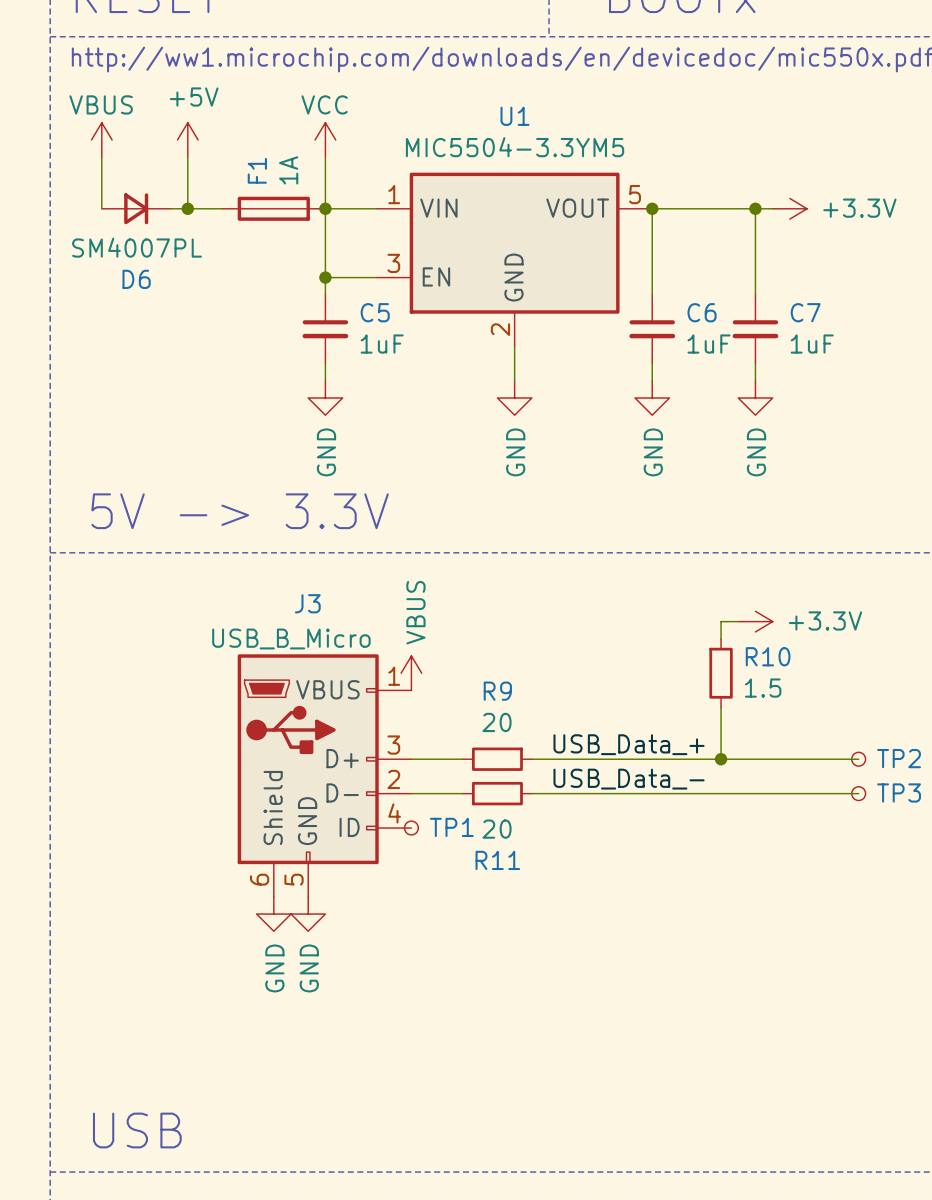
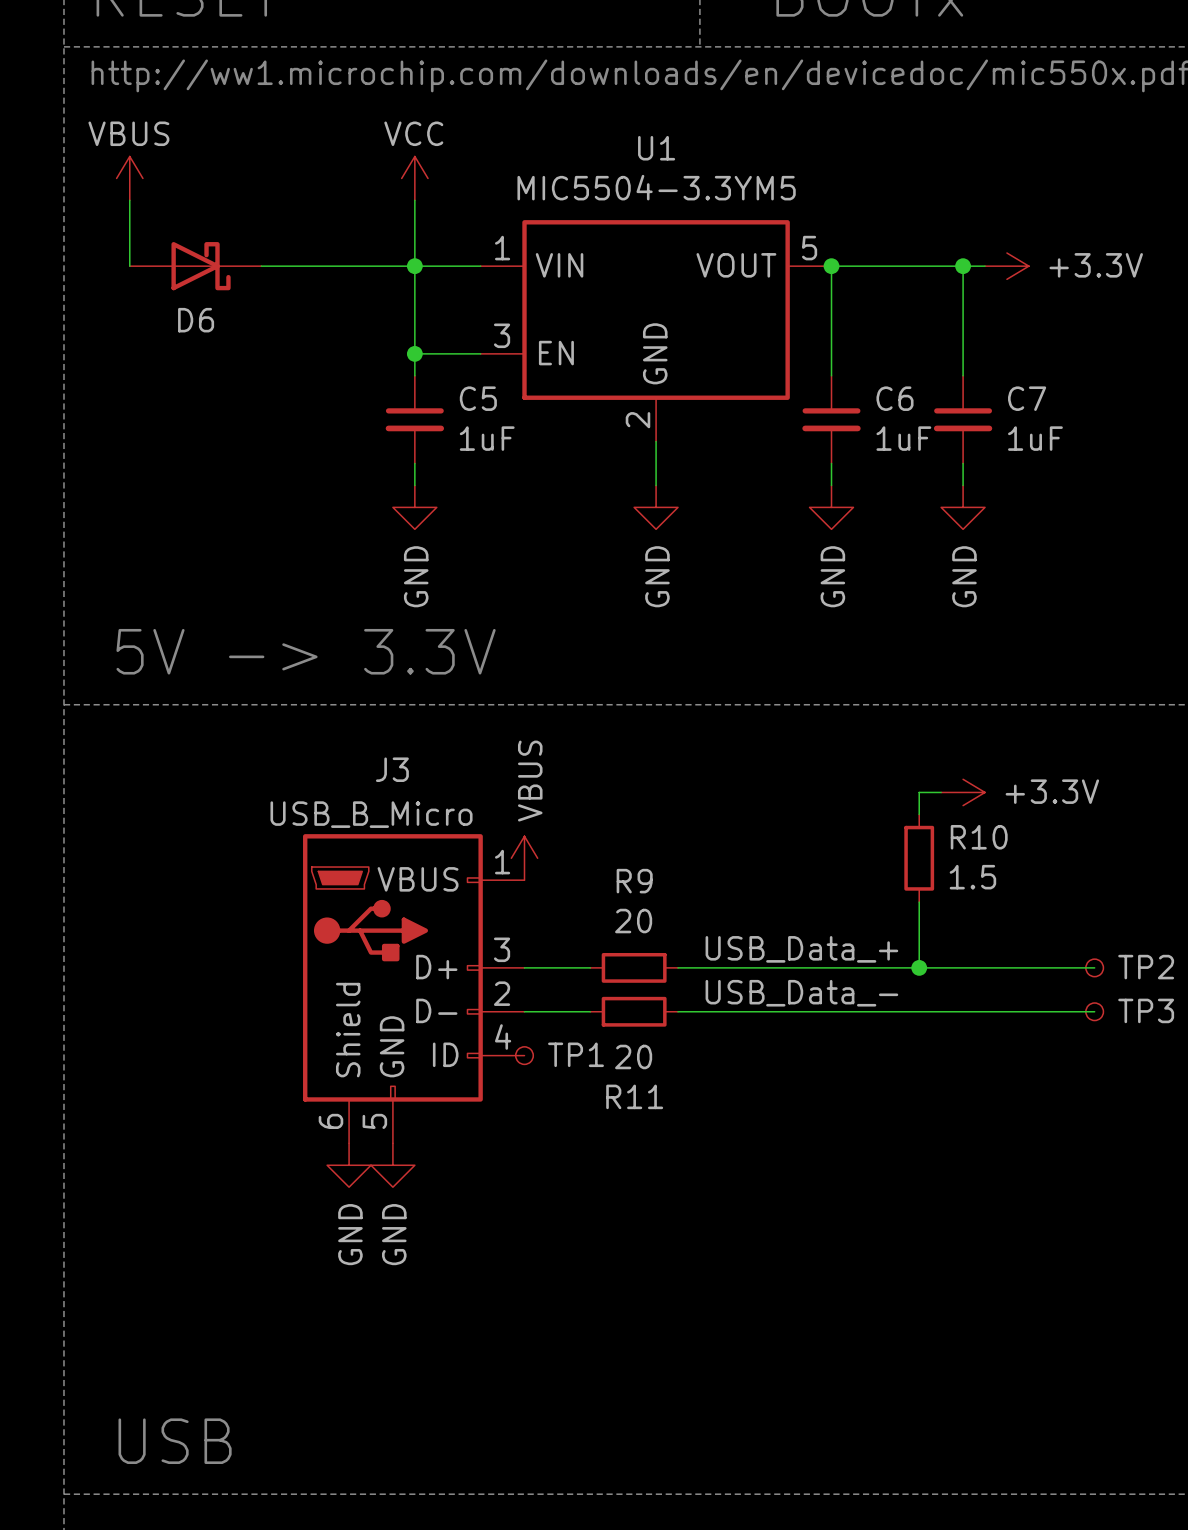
power symbol: +5V (187, 139) -> none
wire: (187, 157) (187, 208) -> none
D6 symbol: [101, 193, 171, 225] -> [129, 242, 262, 291]
junction: (187, 208) -> none
F1: 1A (273, 208) -> none
D6 value: SM4007PL (137, 247) -> none
D6 name position: D6 (136, 279) -> D6 (196, 320)

